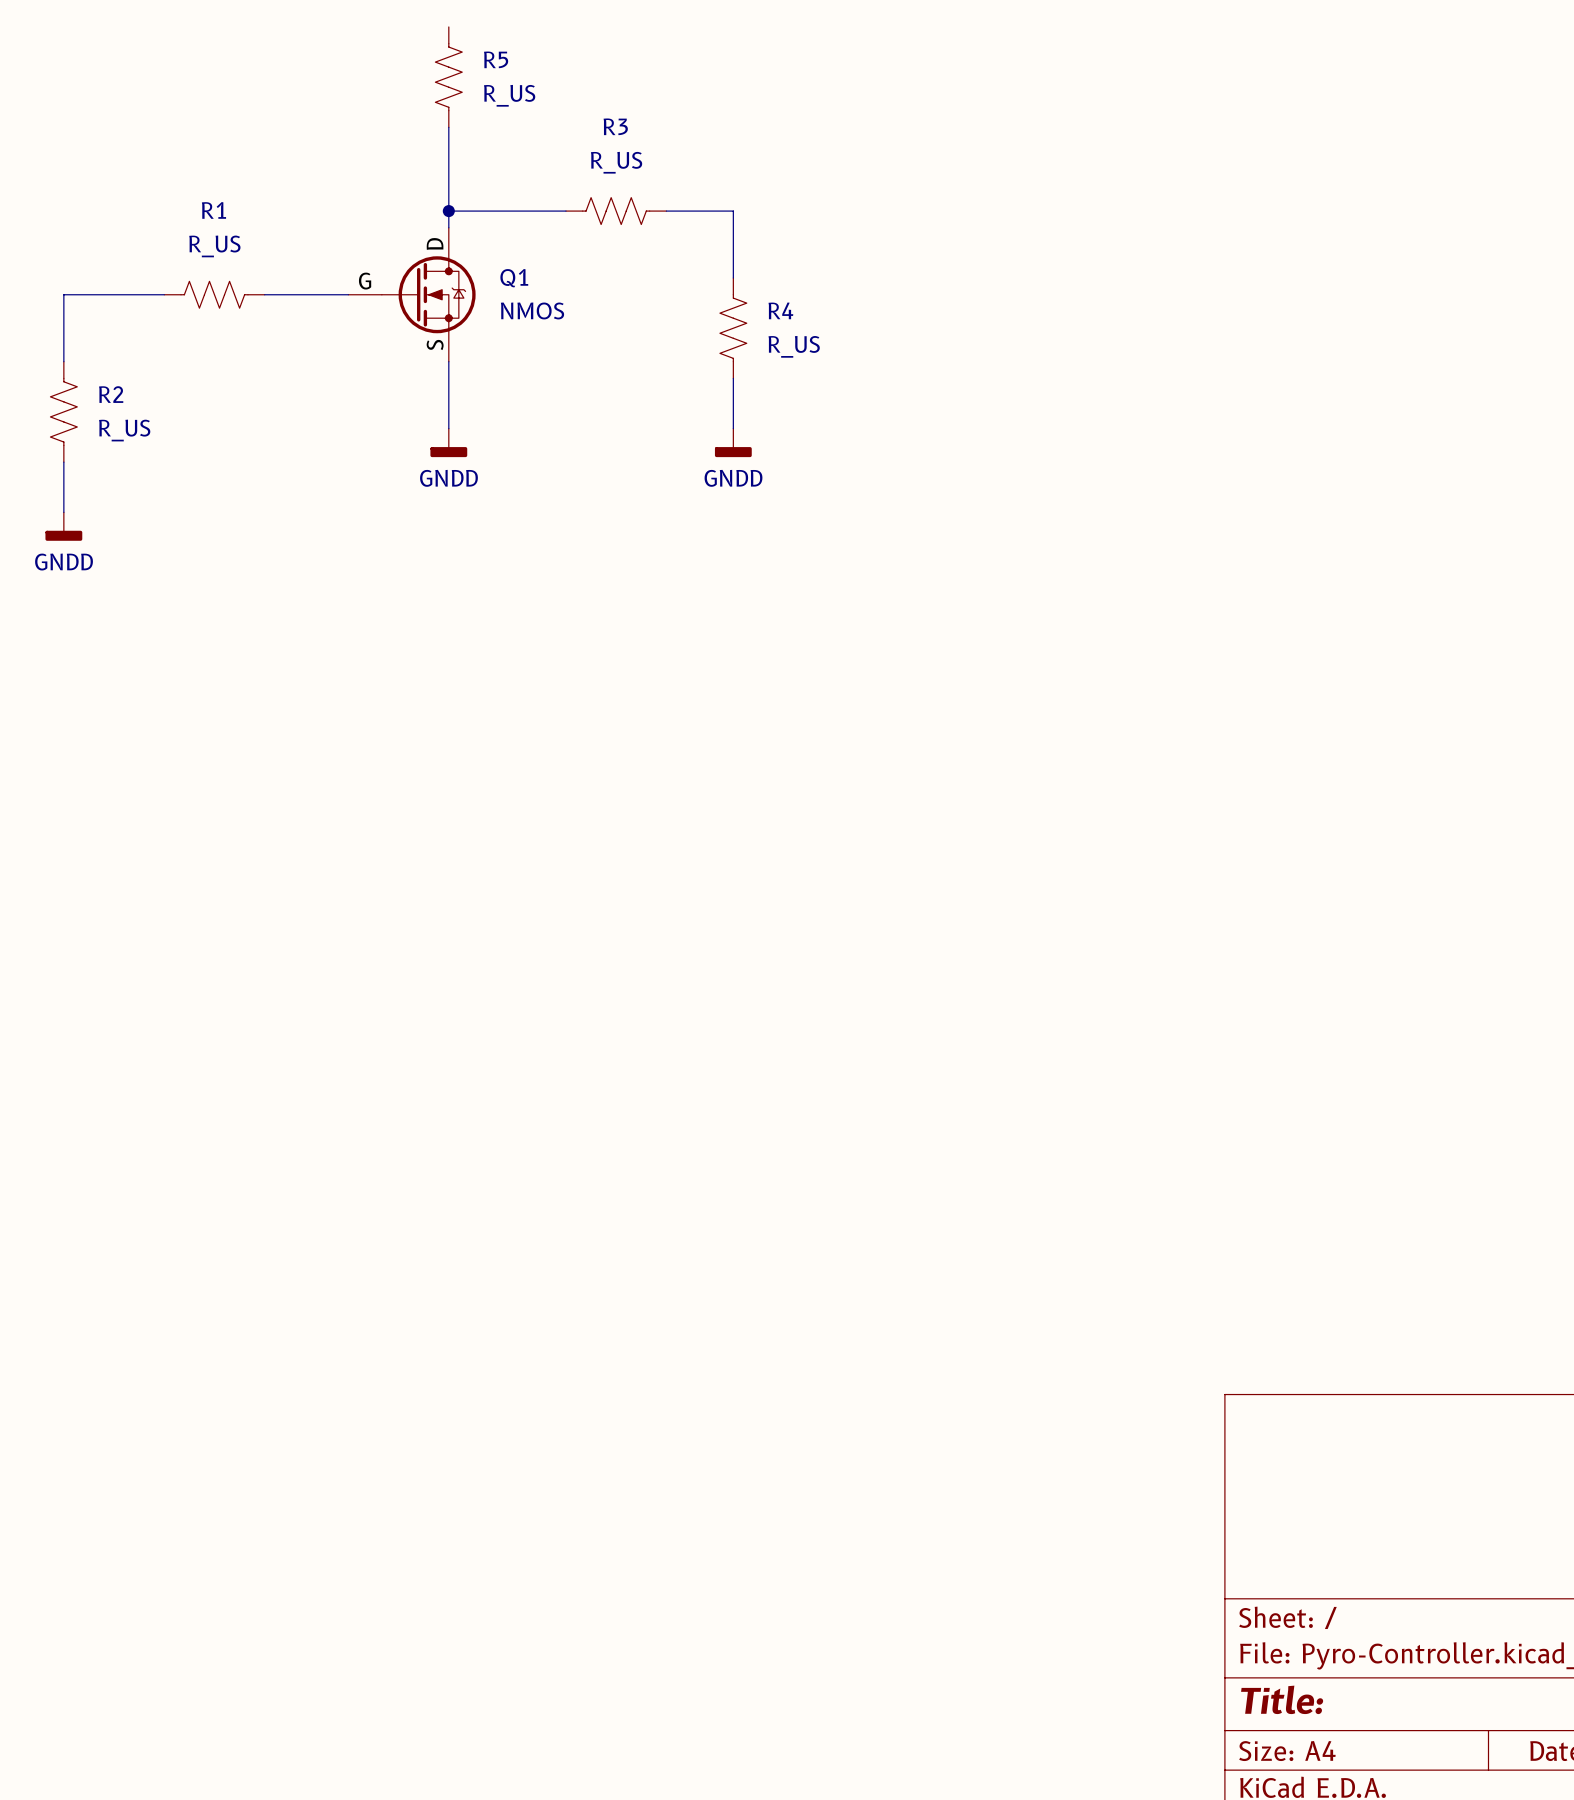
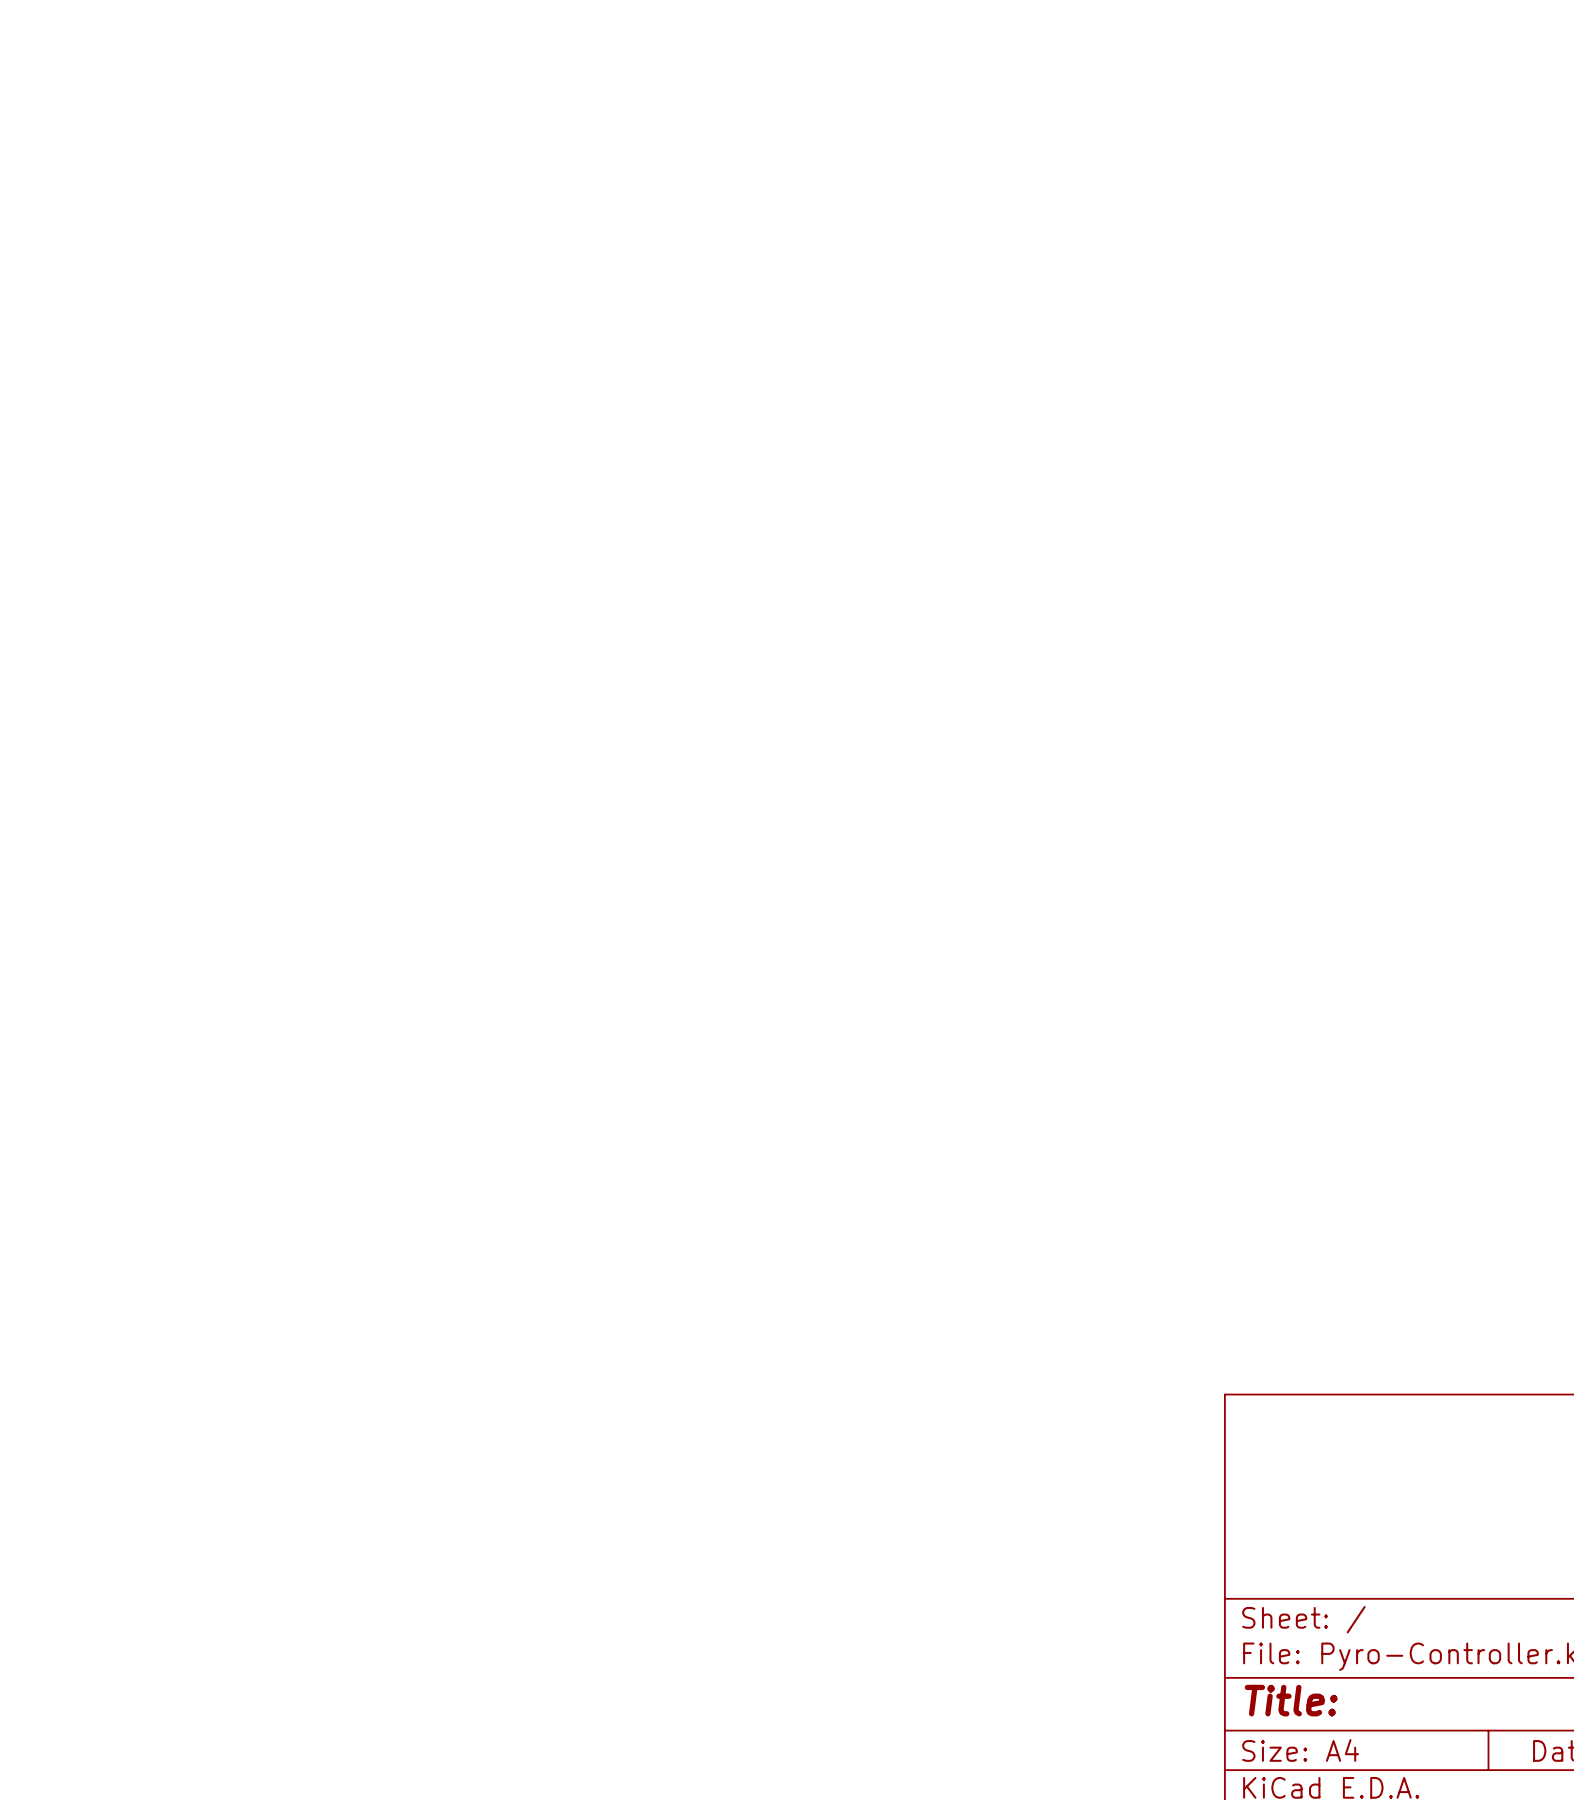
R5: R_US (448, 77) -> none
wire: (448, 127) (448, 227) -> none
wire: (448, 211) (565, 211) -> none
junction: (448, 211) -> none
R3: R_US (616, 211) -> none
wire: (666, 211) (733, 211) (733, 278) -> none
wire: (164, 294) (63, 294) (63, 361) -> none
R1: R_US (214, 294) -> none
wire: (264, 294) (348, 294) -> none
Q1: NMOS (411, 294) -> none
R4: R_US (733, 328) -> none
wire: (448, 361) (448, 428) -> none
wire: (733, 378) (733, 428) -> none
R2: R_US (63, 411) -> none
power symbol: GNDD (448, 442) -> none
power symbol: GNDD (733, 442) -> none
wire: (63, 462) (63, 512) -> none
power symbol: GNDD (63, 526) -> none

